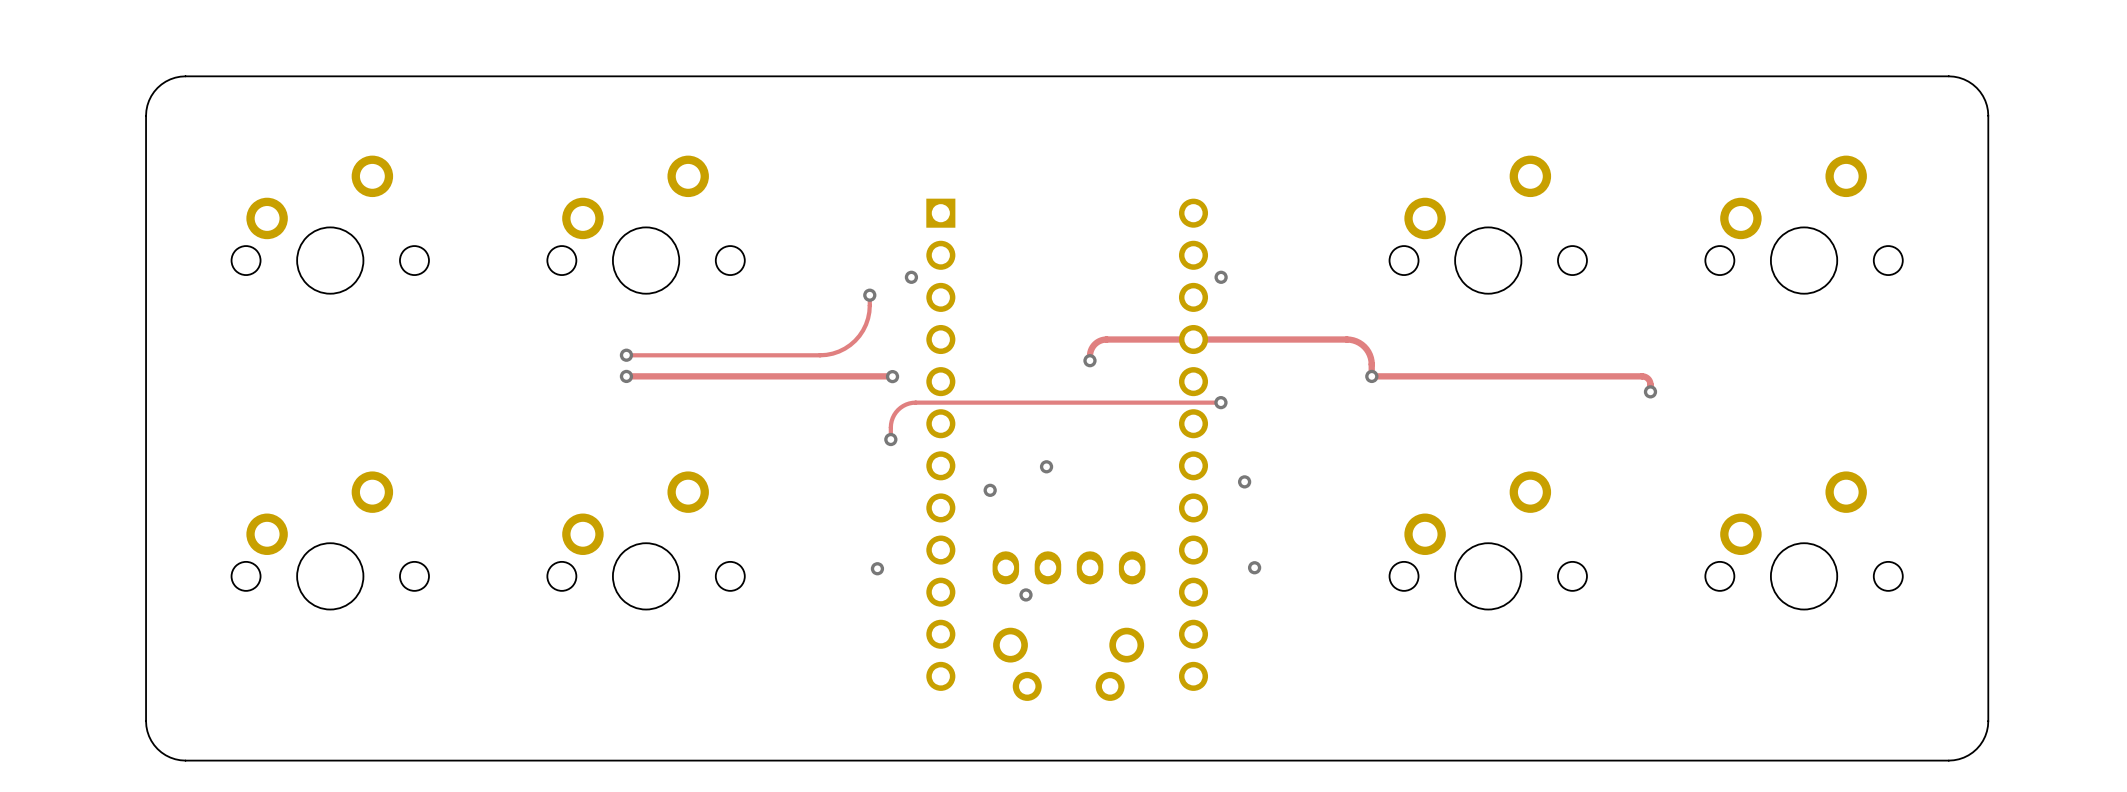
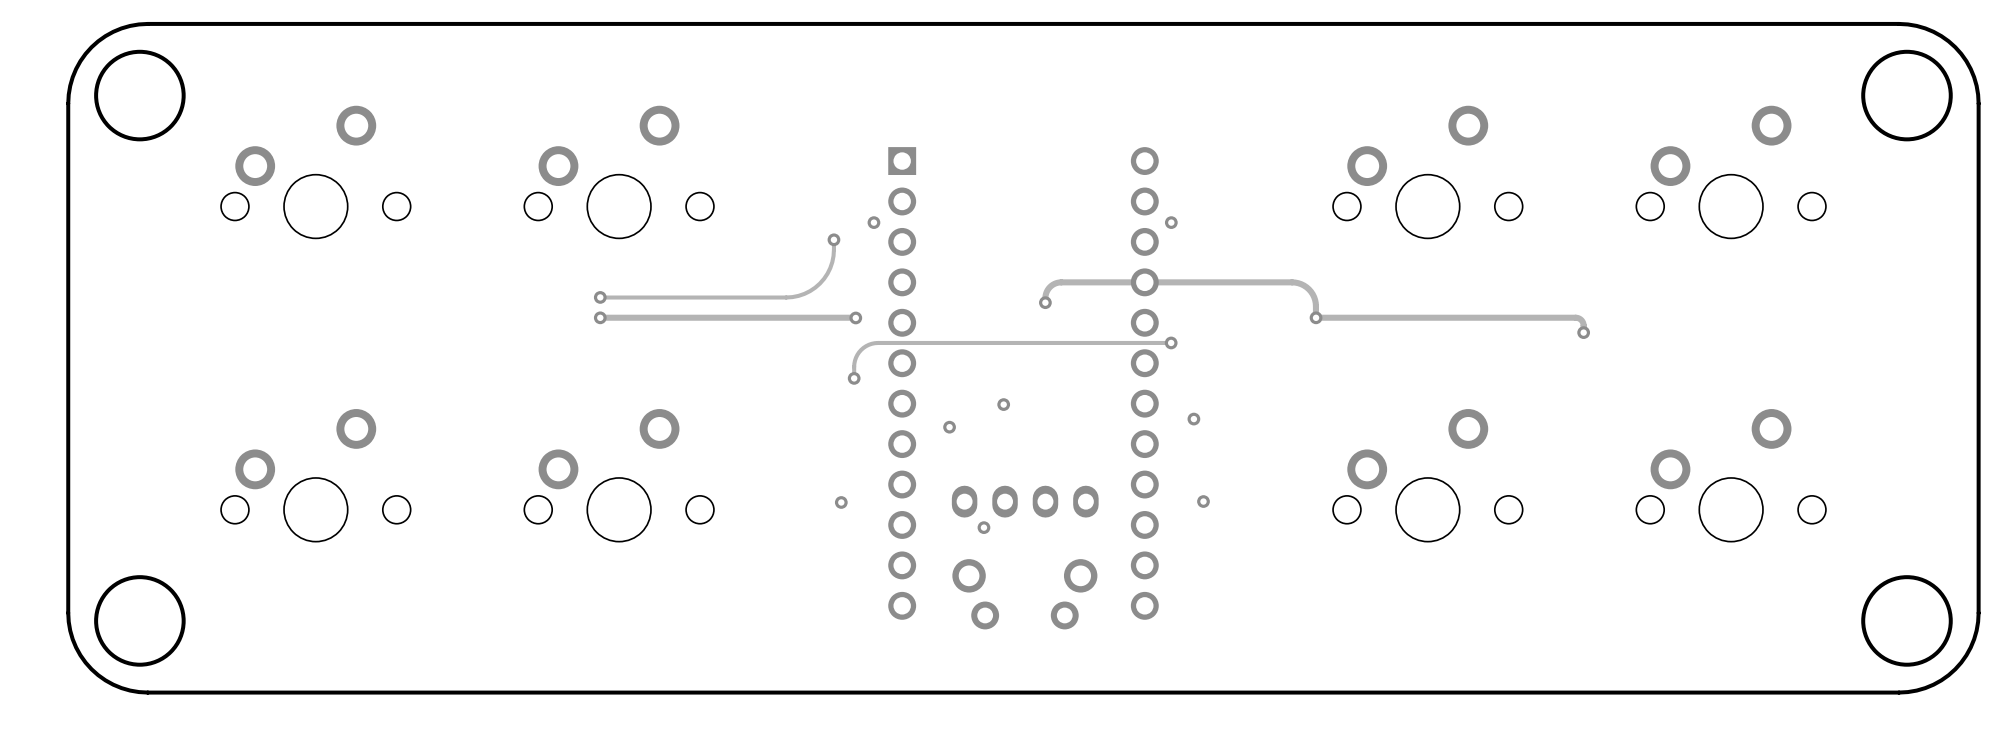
board edge: (185, 76) (1948, 76) (1963, 79) (1980, 91) (1985, 100) (1988, 115) (1988, 721) (1985, 736) (1976, 749) (1968, 755) (1948, 760) (185, 760) (170, 757) (154, 745) (149, 736) (146, 721) (146, 115) (149, 100) (157, 87) (170, 79) (185, 76) -> (147, 23) (130, 25) (113, 31) (91, 47) (76, 68) (70, 85) (68, 103) (68, 621) (76, 647) (85, 662) (98, 675) (121, 688) (147, 692) (1899, 692) (1916, 690) (1941, 680) (1961, 662) (1974, 639) (1978, 612) (1978, 94) (1970, 68) (1961, 53) (1941, 36) (1925, 28) (1899, 23) (147, 23)
round board edge: none -> [94, 49, 186, 142]
round board edge: none -> [1861, 49, 1953, 142]
round board edge: none -> [94, 575, 186, 667]
round board edge: none -> [1861, 575, 1953, 667]

